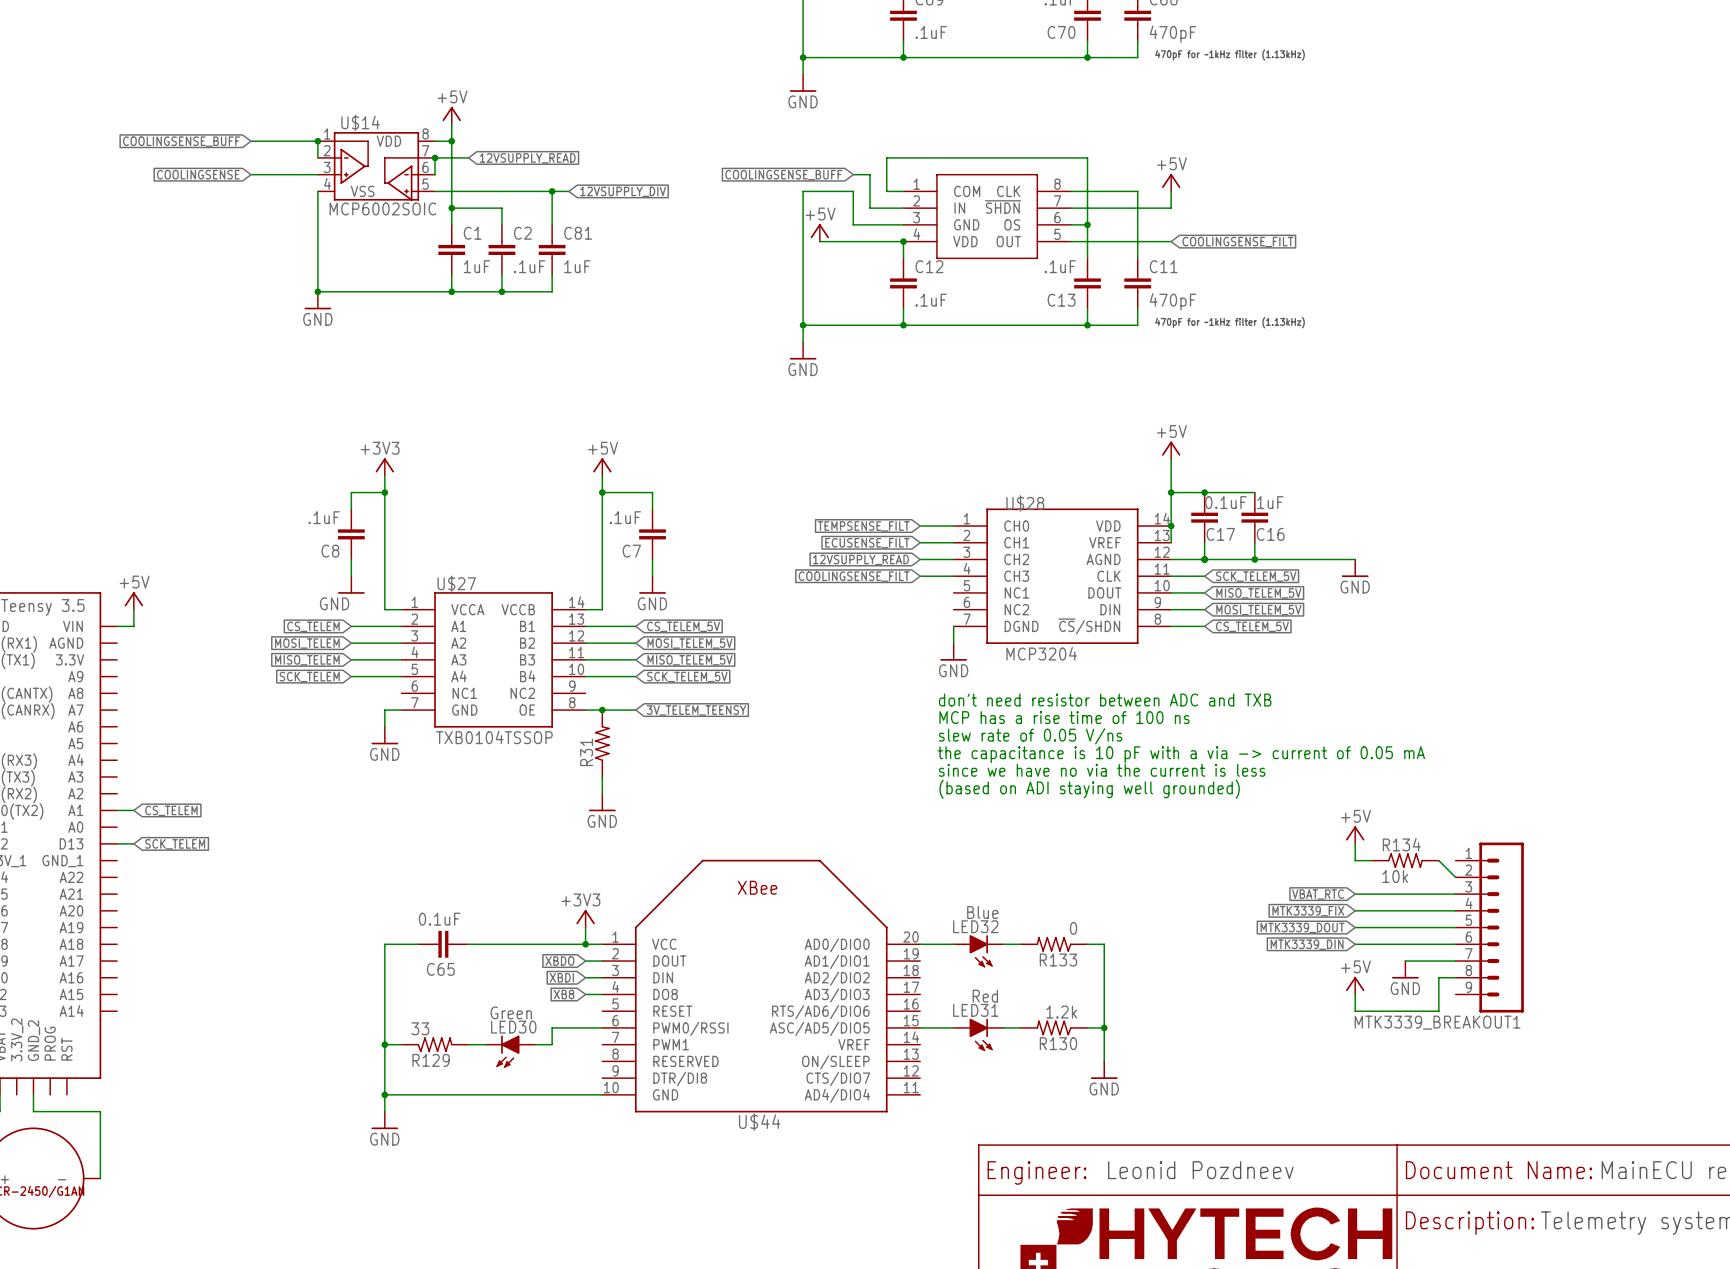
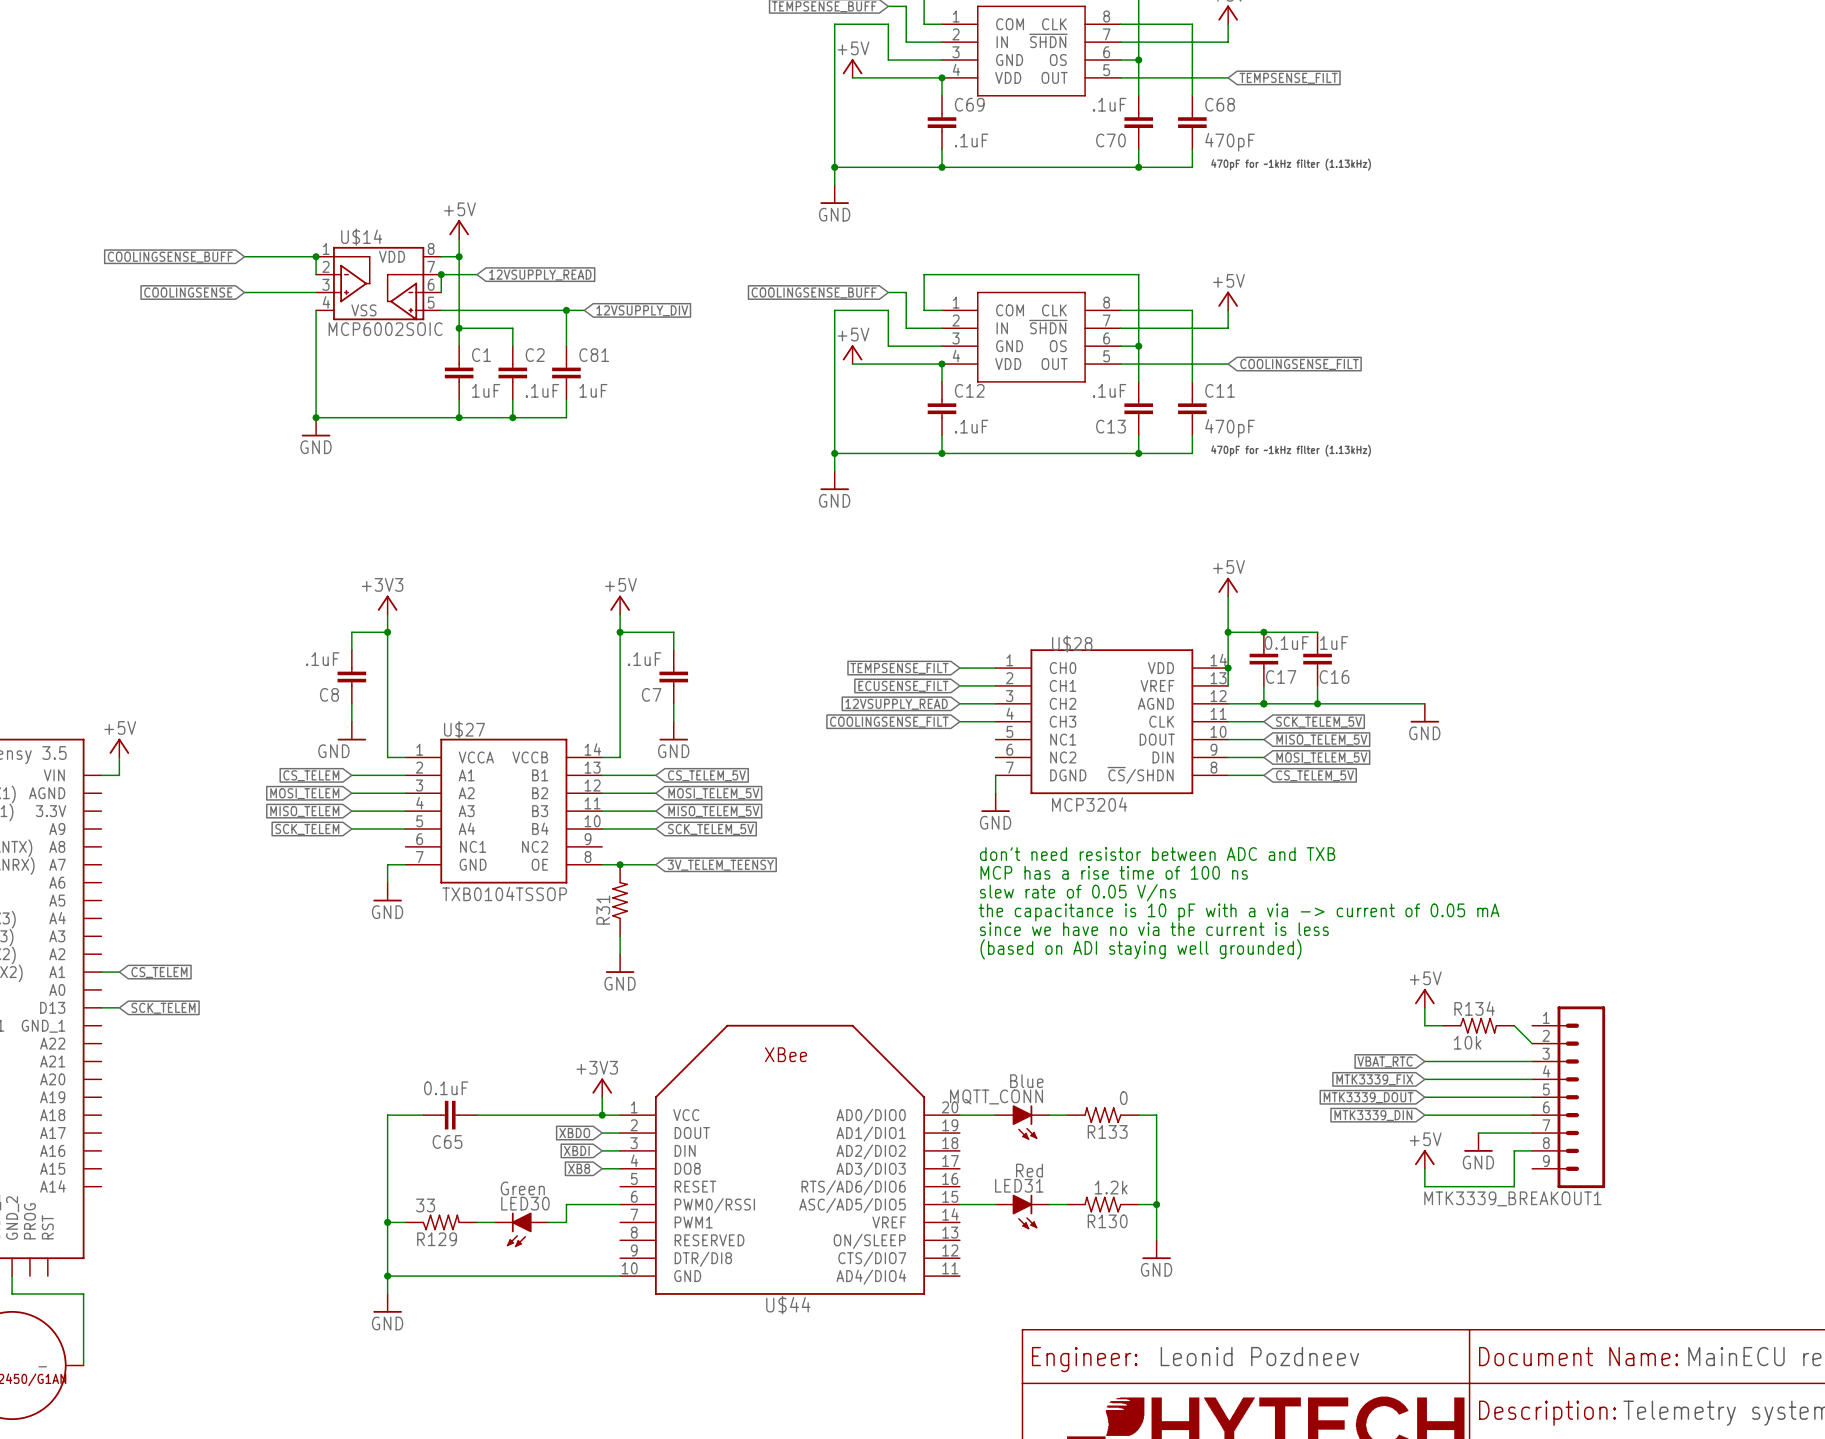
LED32 name: LED32 (975, 926) -> MQTT_CONN (996, 1096)

